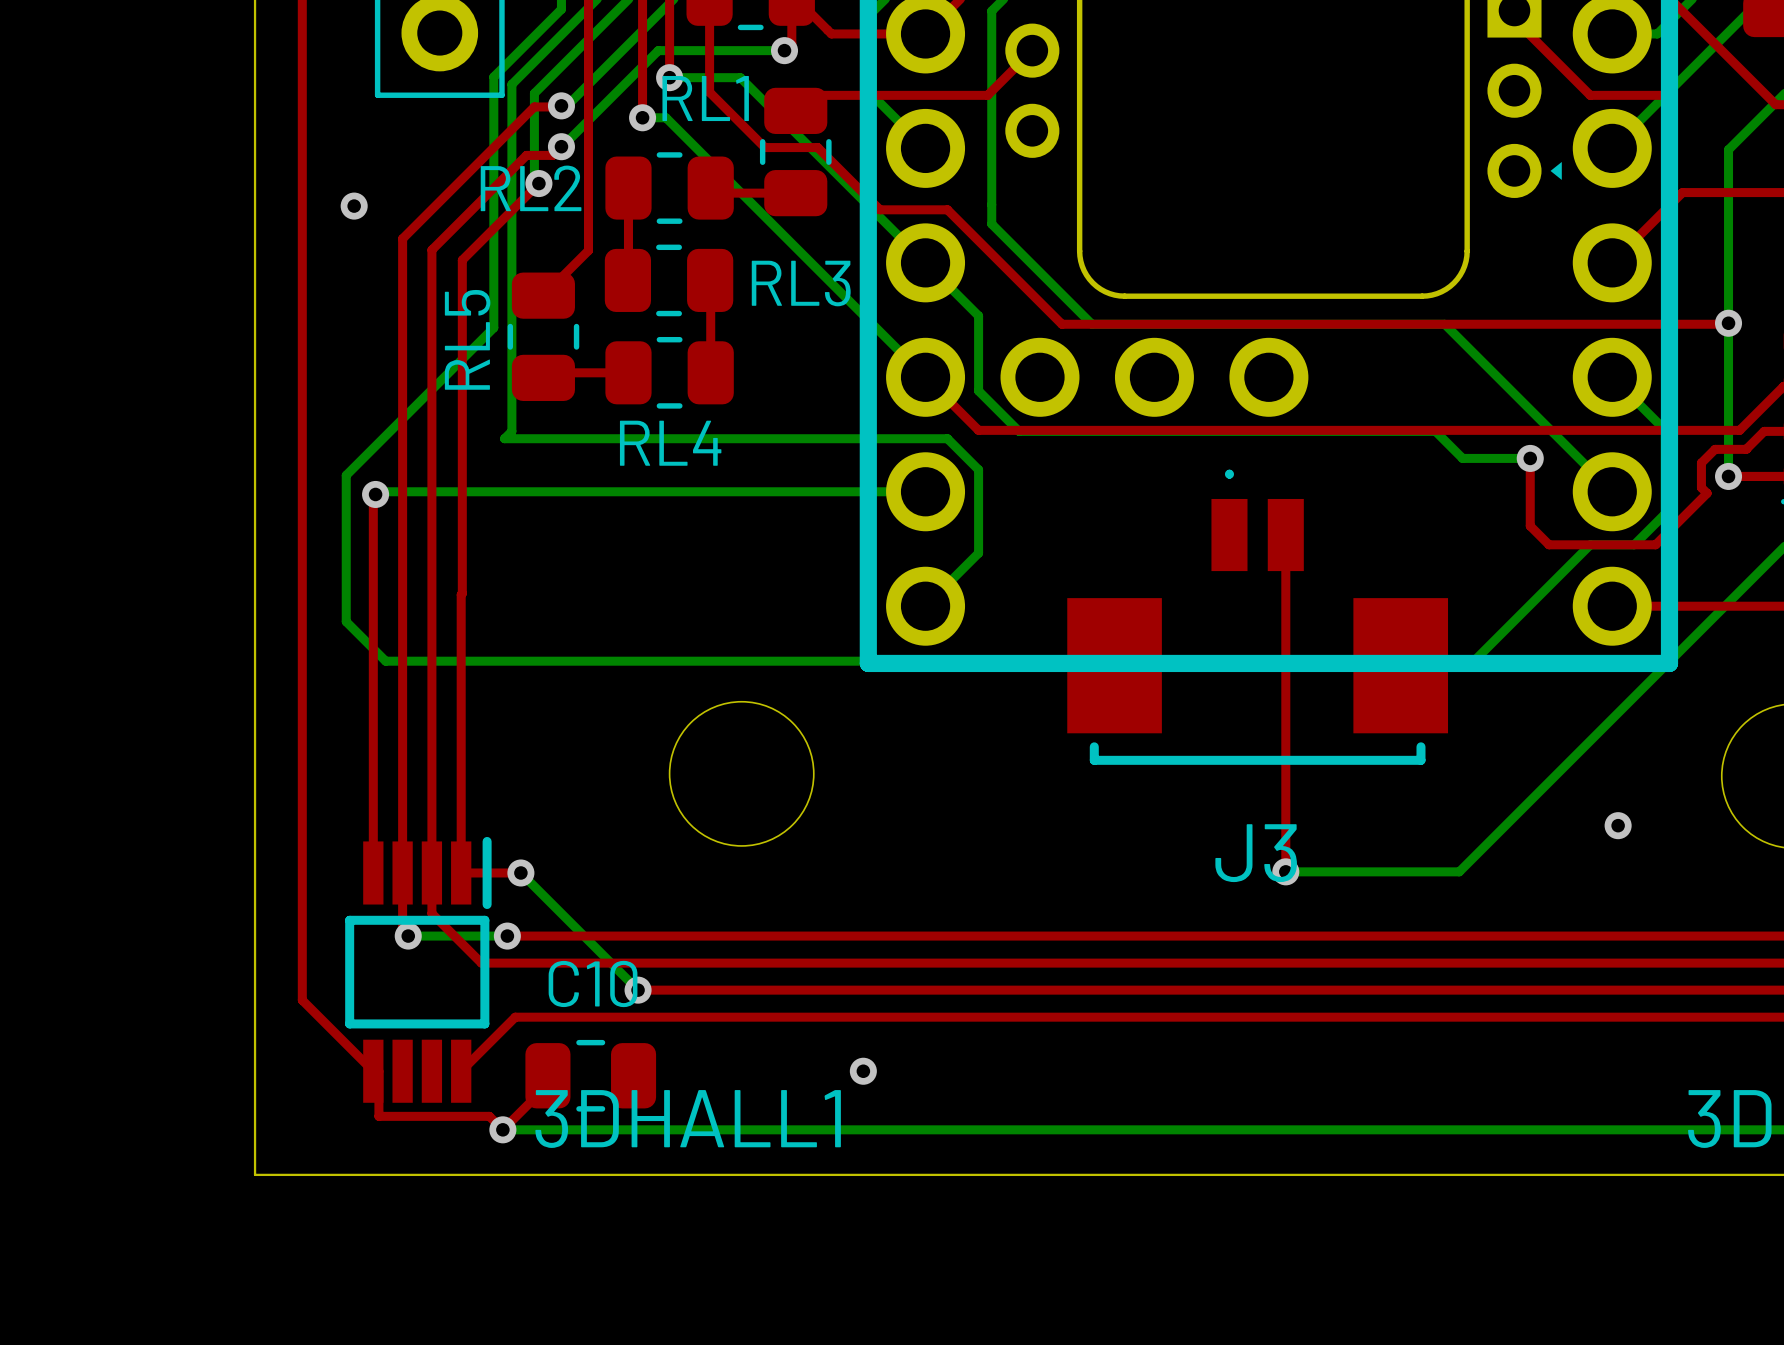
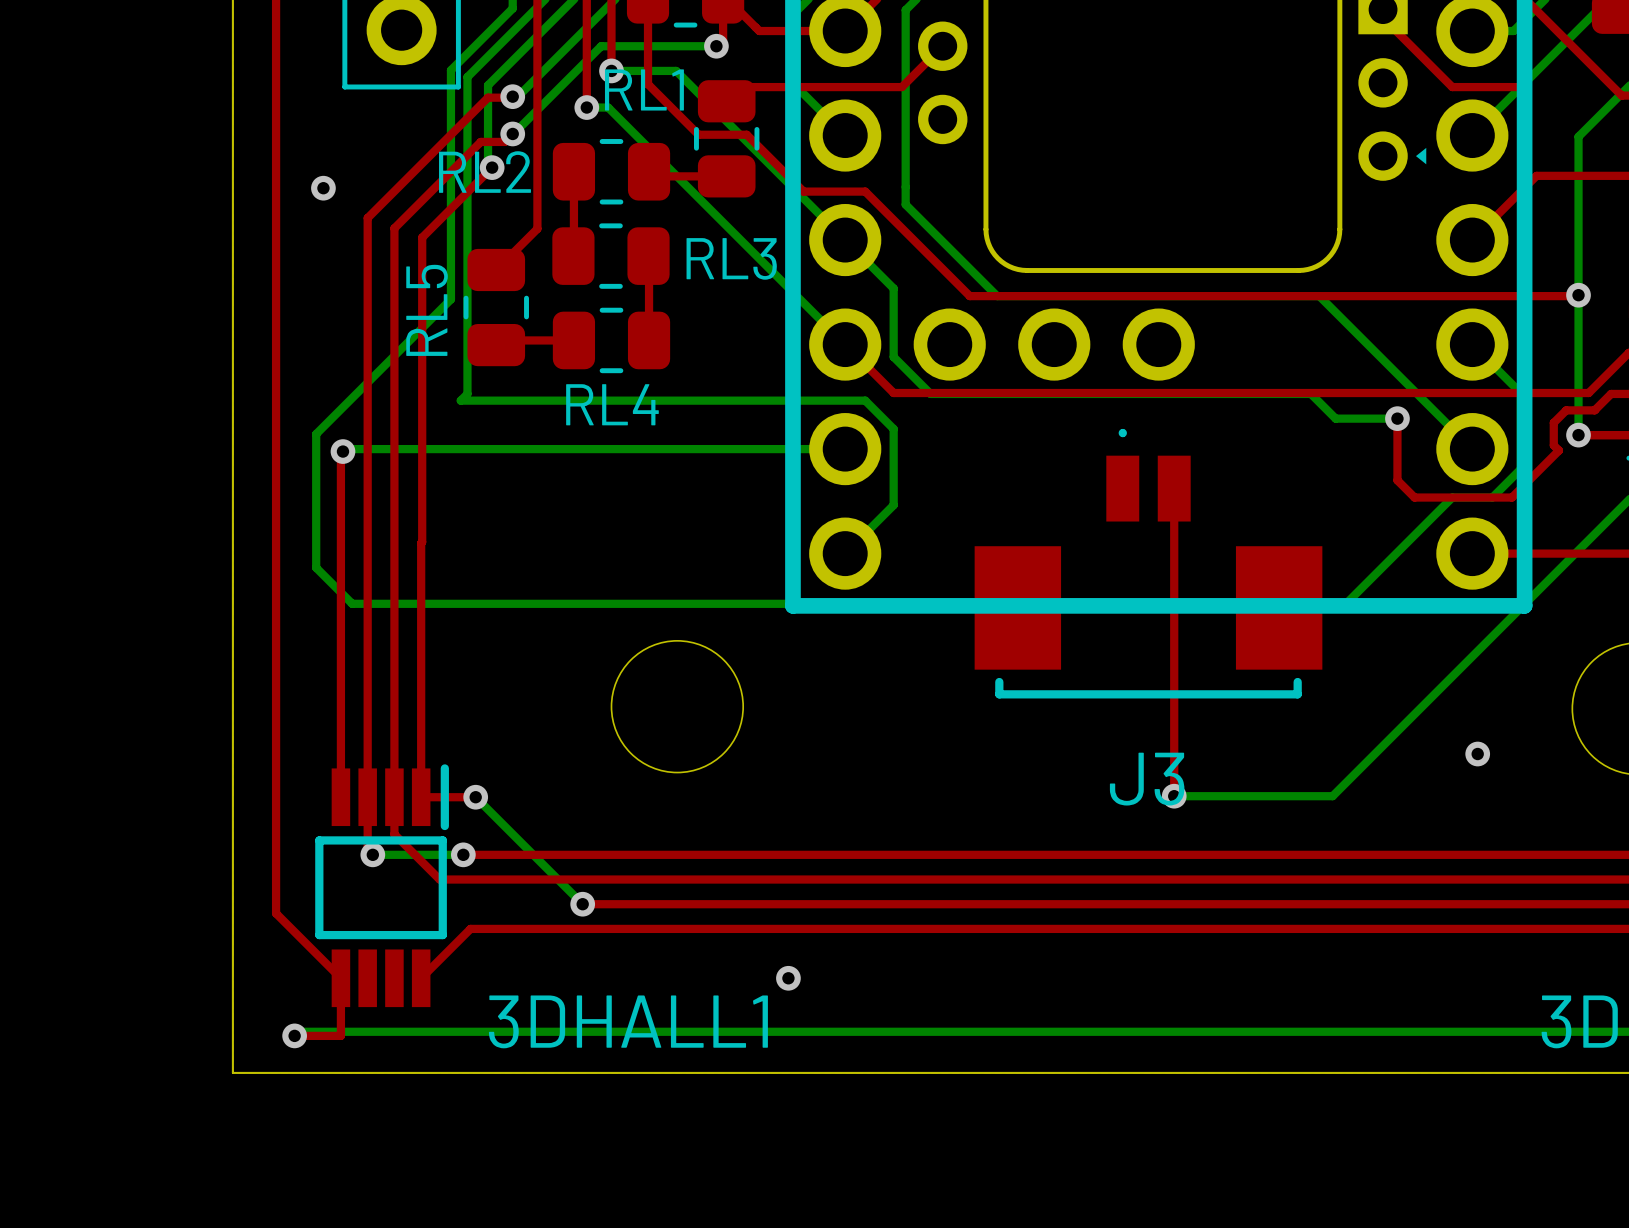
top track: (373, 1071) (378, 1071) (378, 1116) (489, 1116) (502, 1129) (550, 1082) (550, 1075) -> (340, 978) (340, 1035) (294, 1035)
C10: (590, 1075) -> none
bottom track: none -> (459, 1031) (298, 1031) (294, 1035)
via position: (502, 1129) -> (294, 1035)

